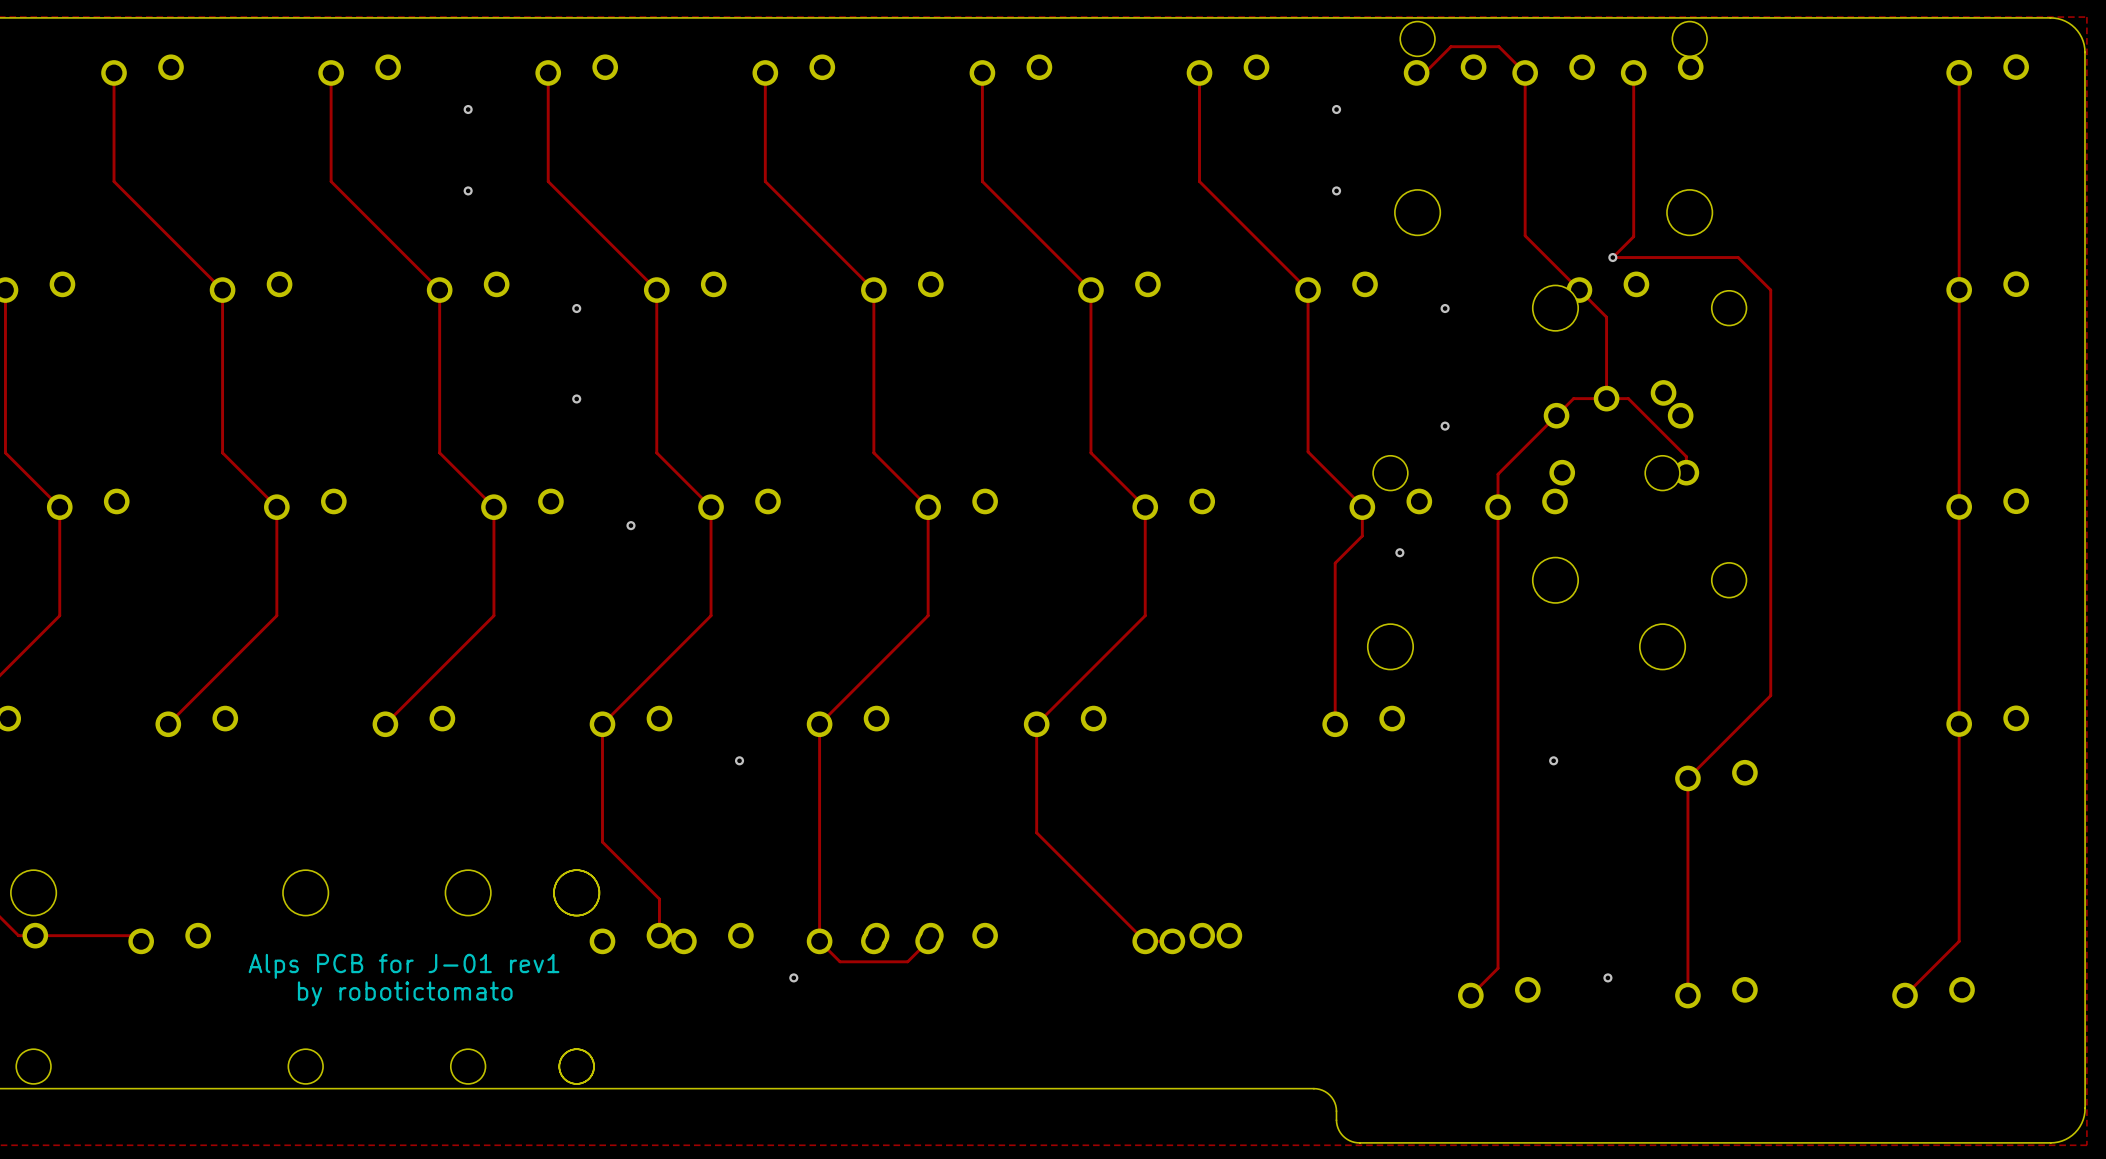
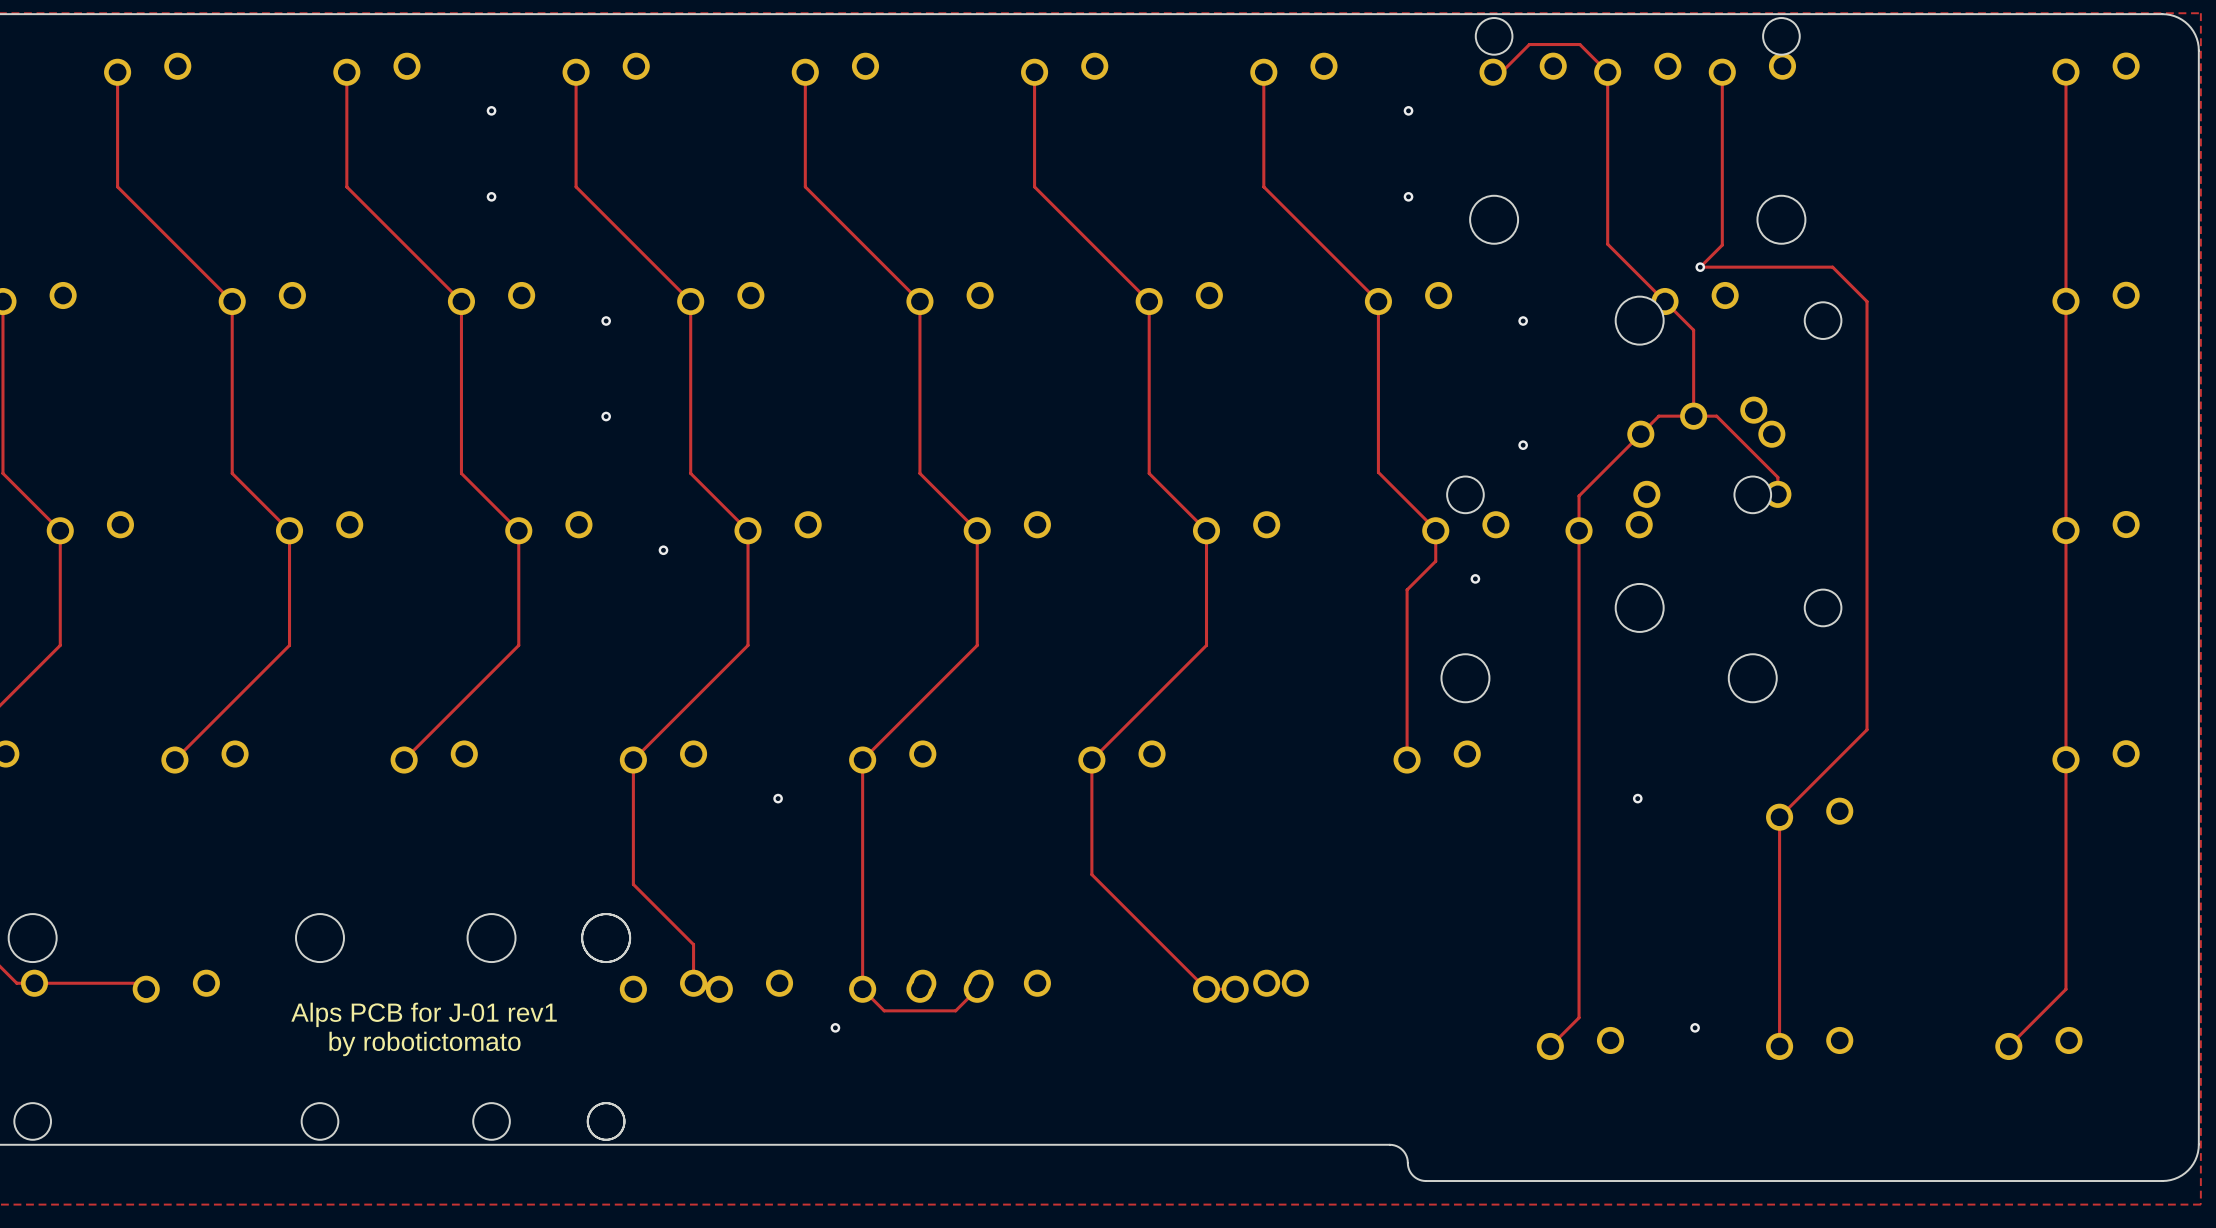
board edge: (2084, 52) (2085, 1108) (2083, 1119) (2077, 1129) (2065, 1139) (2050, 1142) (1357, 1142) (1345, 1138) (1338, 1130) (1335, 1105) (1331, 1097) (1322, 1090) (1313, 1088) -> (2198, 50) (2198, 1144) (2196, 1156) (2191, 1167) (2178, 1177) (2162, 1181) (1425, 1181) (1418, 1179) (1411, 1174) (1406, 1155) (1402, 1150) (1394, 1145) (1384, 1144)

